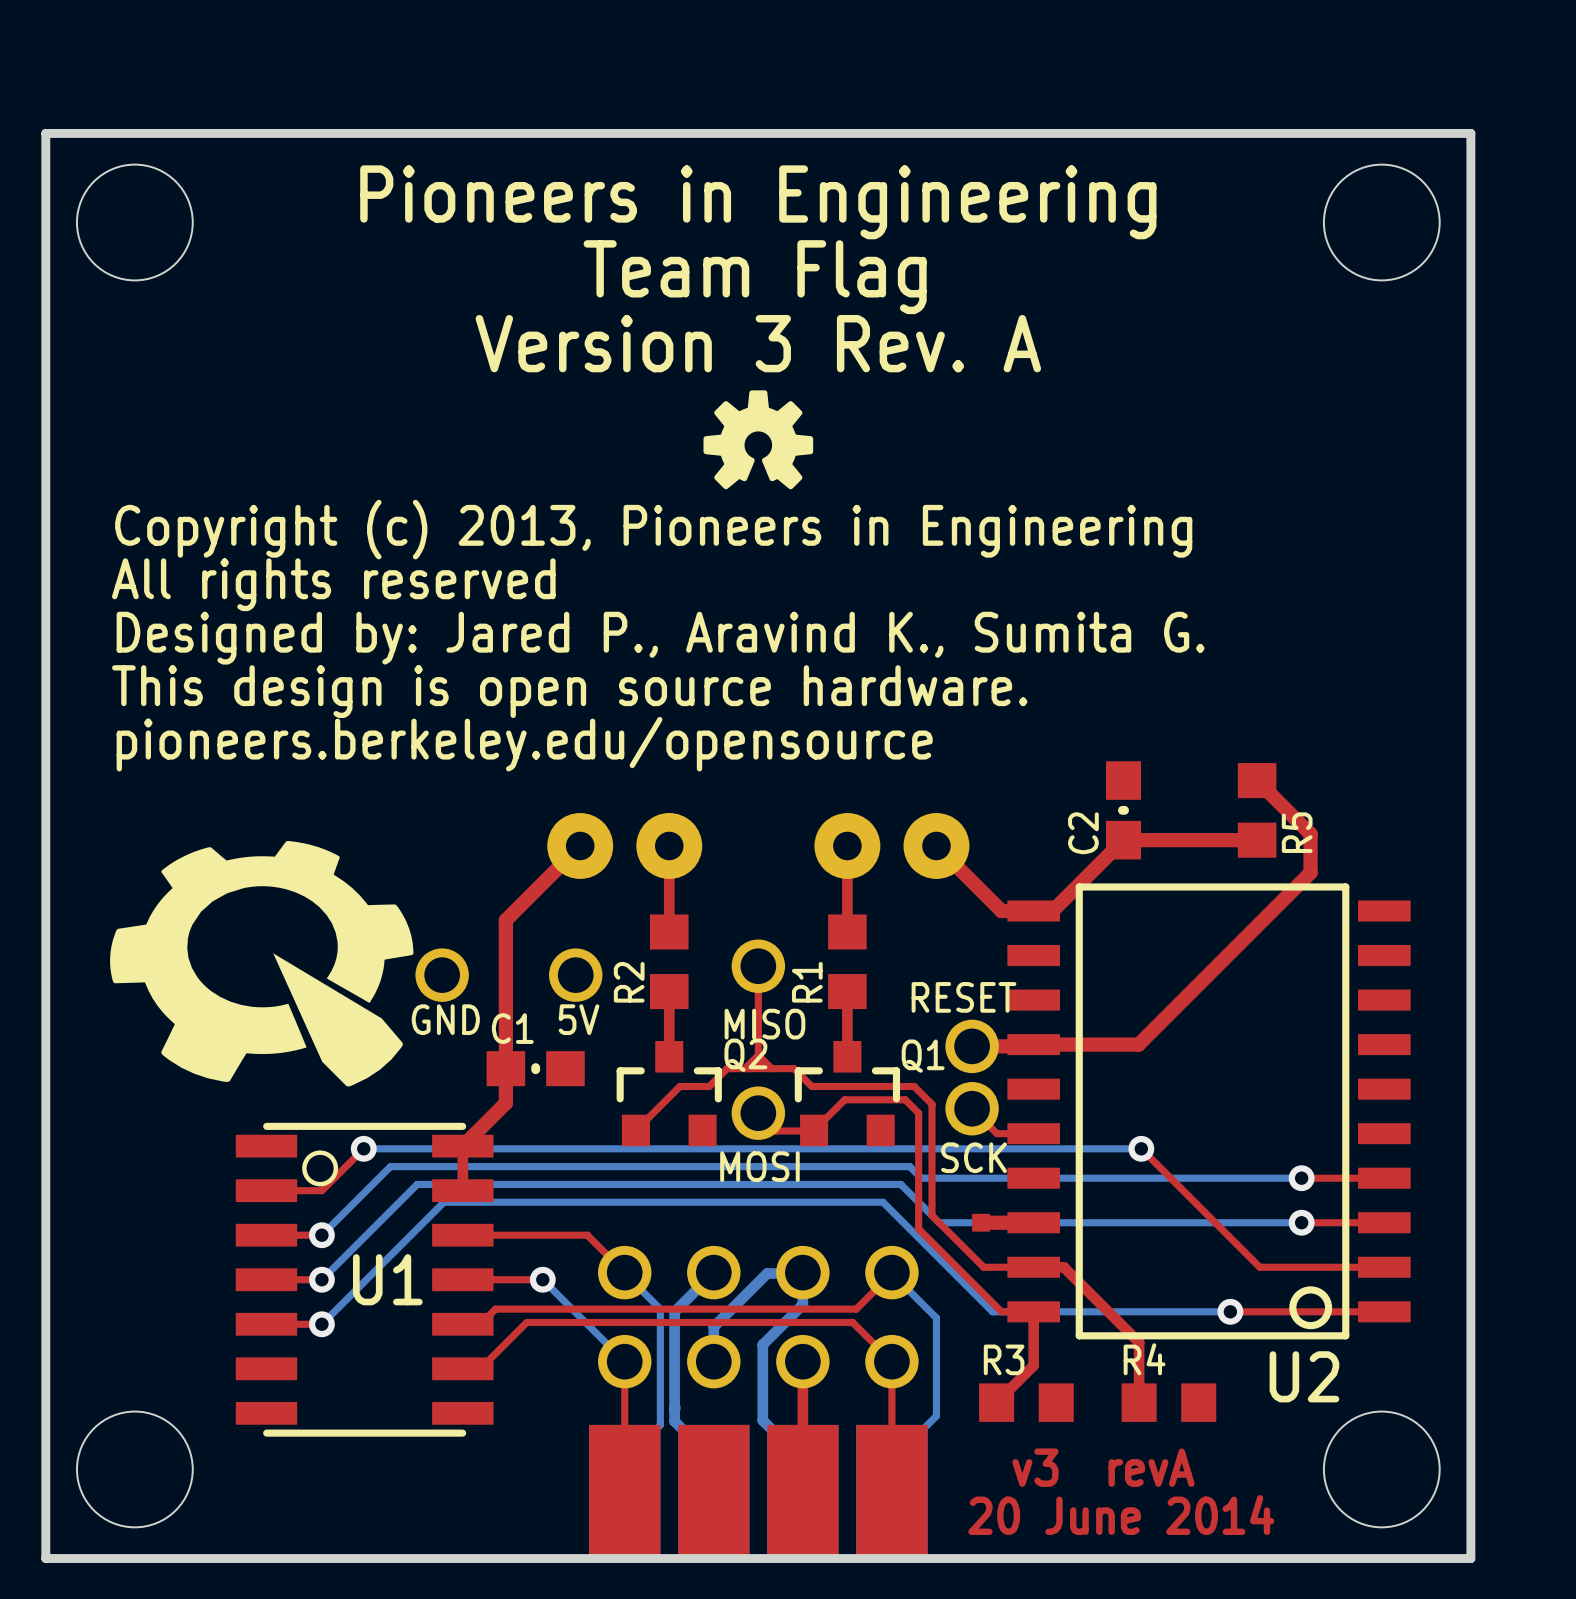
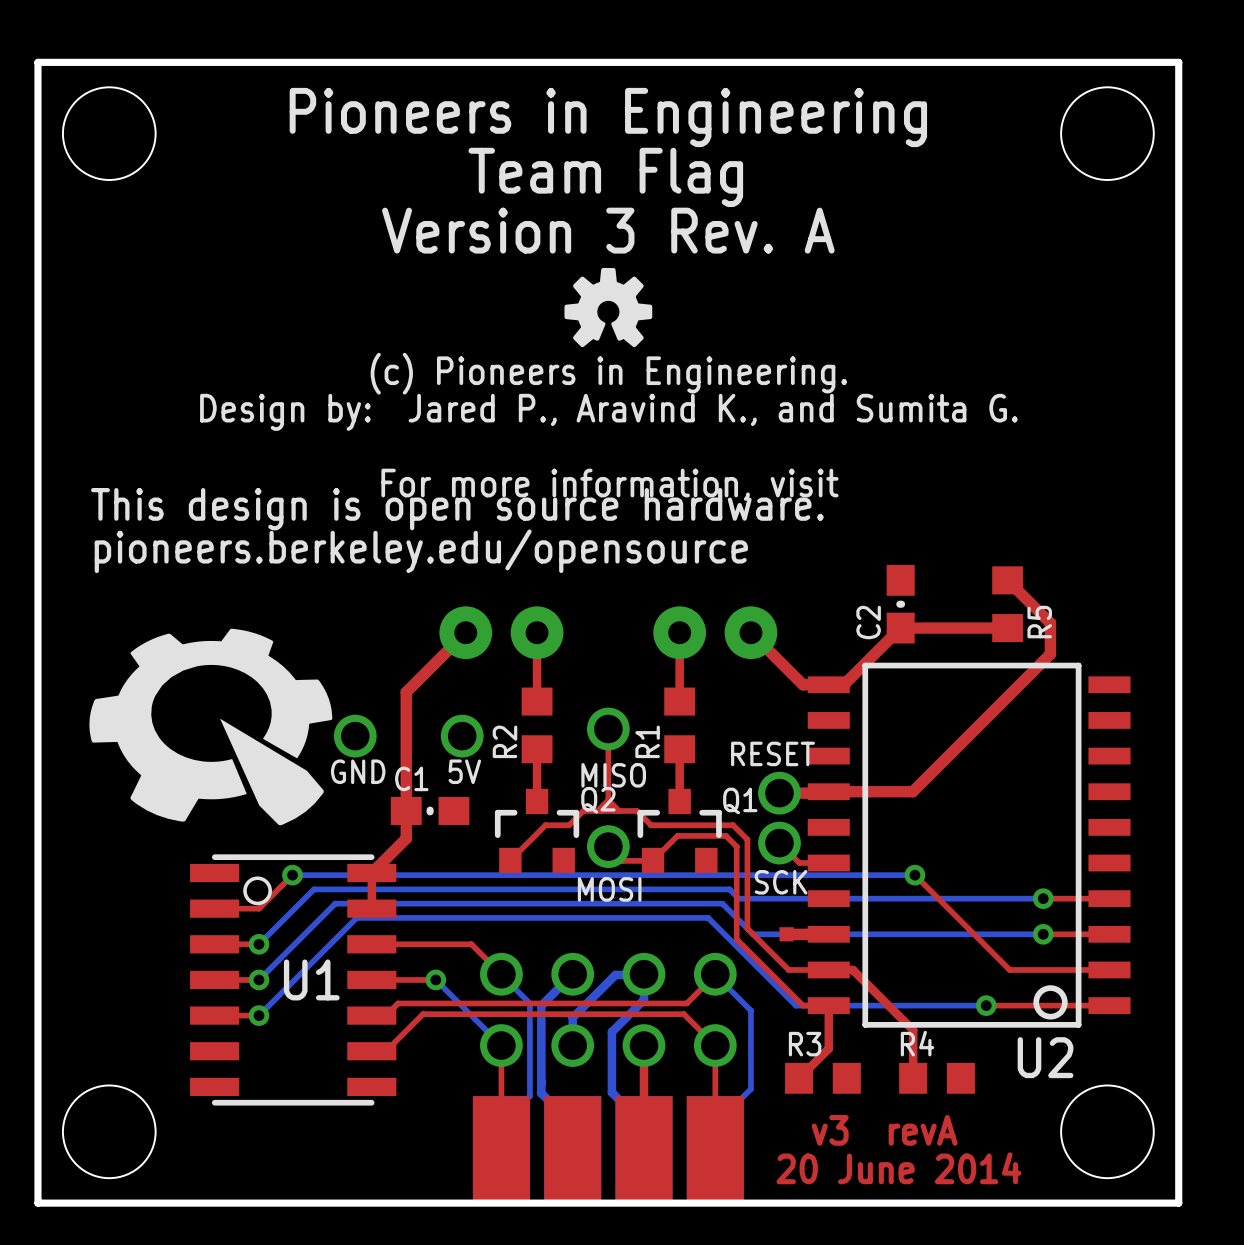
text: Copyright (c) 2013, Pioneers in Engineering (653, 529) -> (c) Pioneers in Engineering. (608, 373)
text: All rights reserved (333, 584) -> none
text: Designed by: Jared P., Aravind K., Sumita G. (660, 638) -> Design by: Jared P., Aravind K., and Sumita G. (608, 412)
text: none -> For more information, visit (609, 484)

